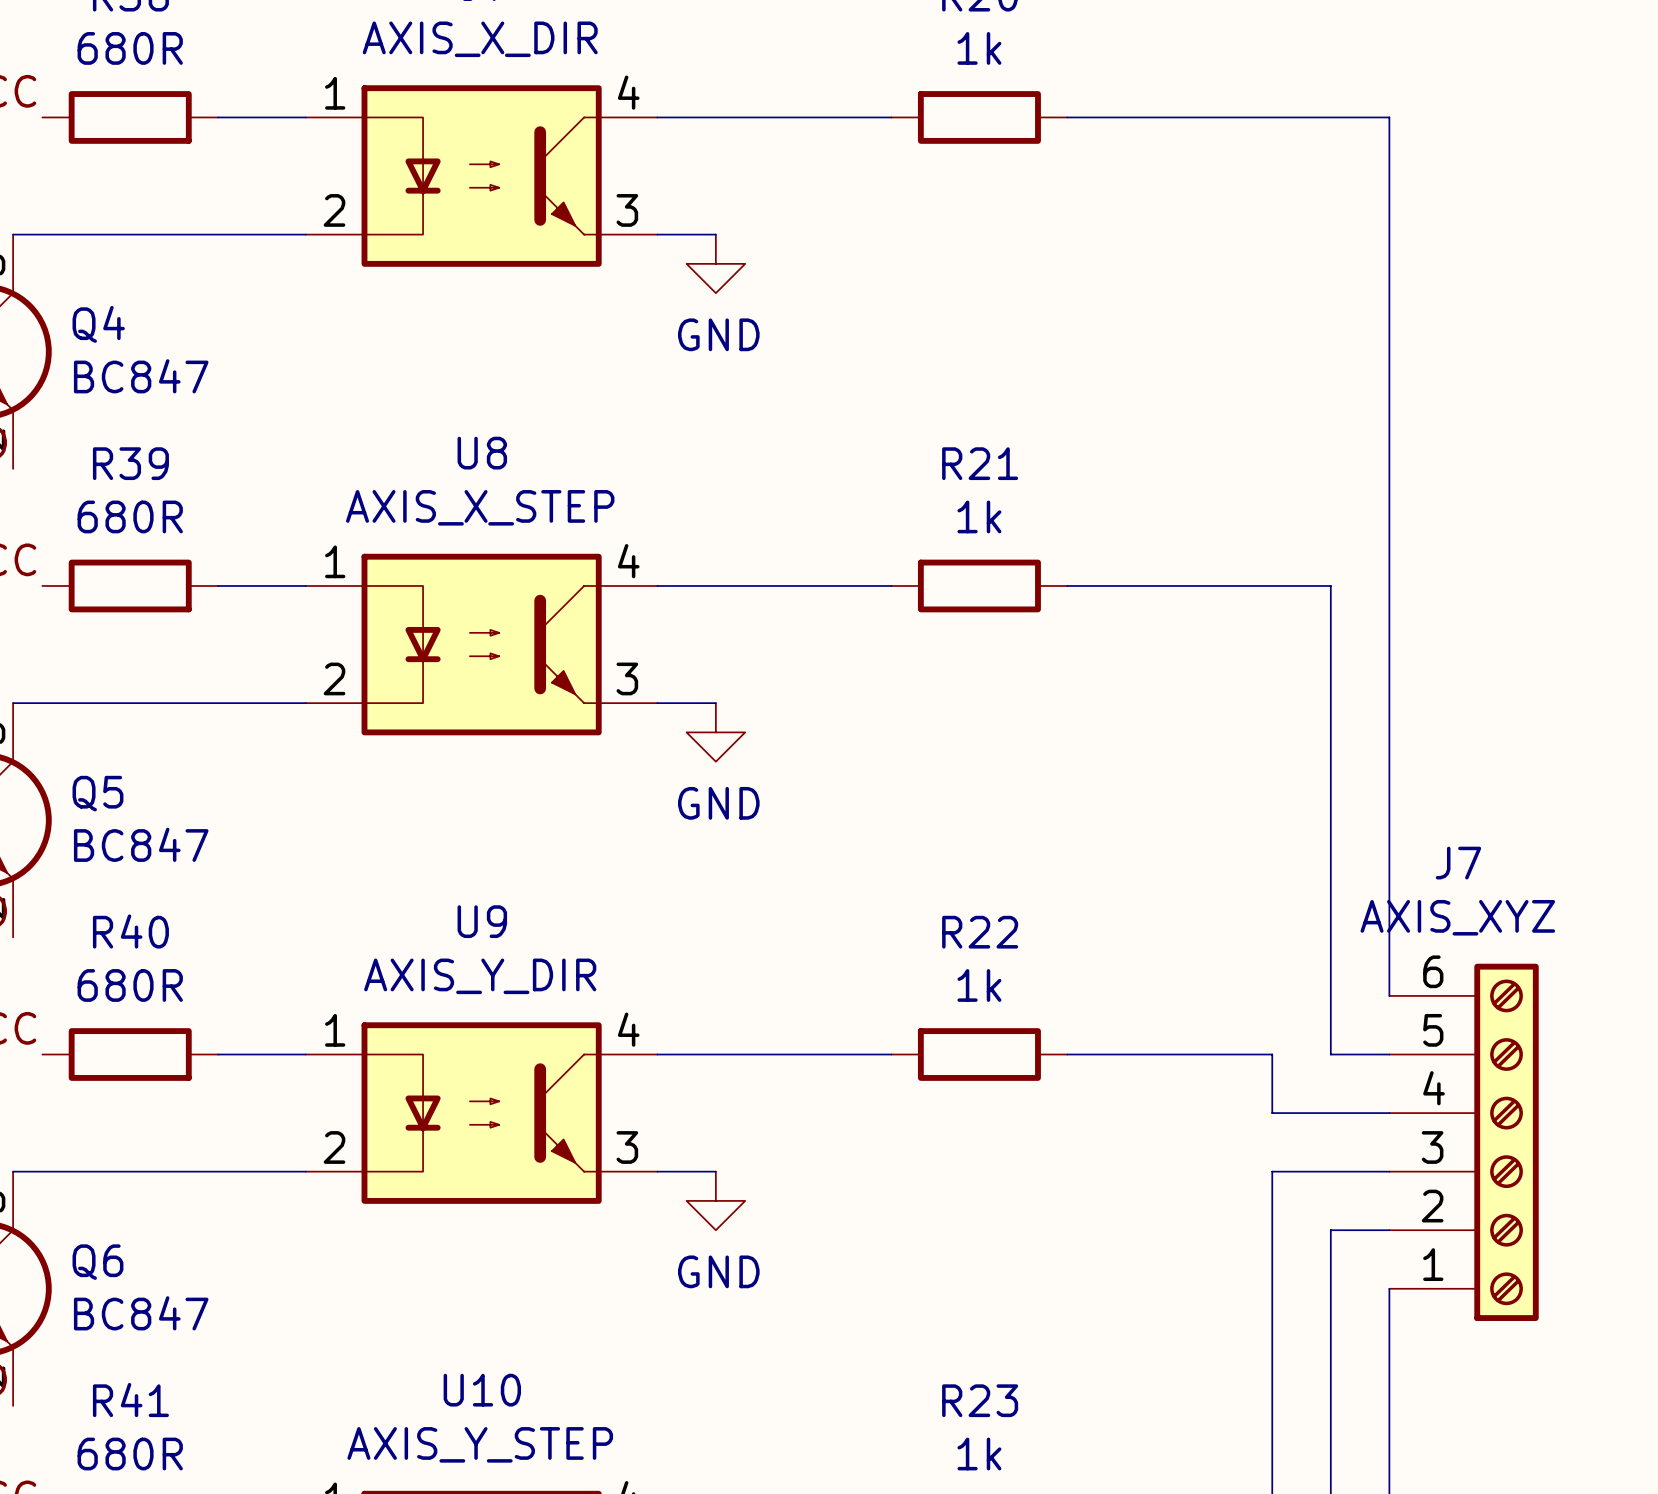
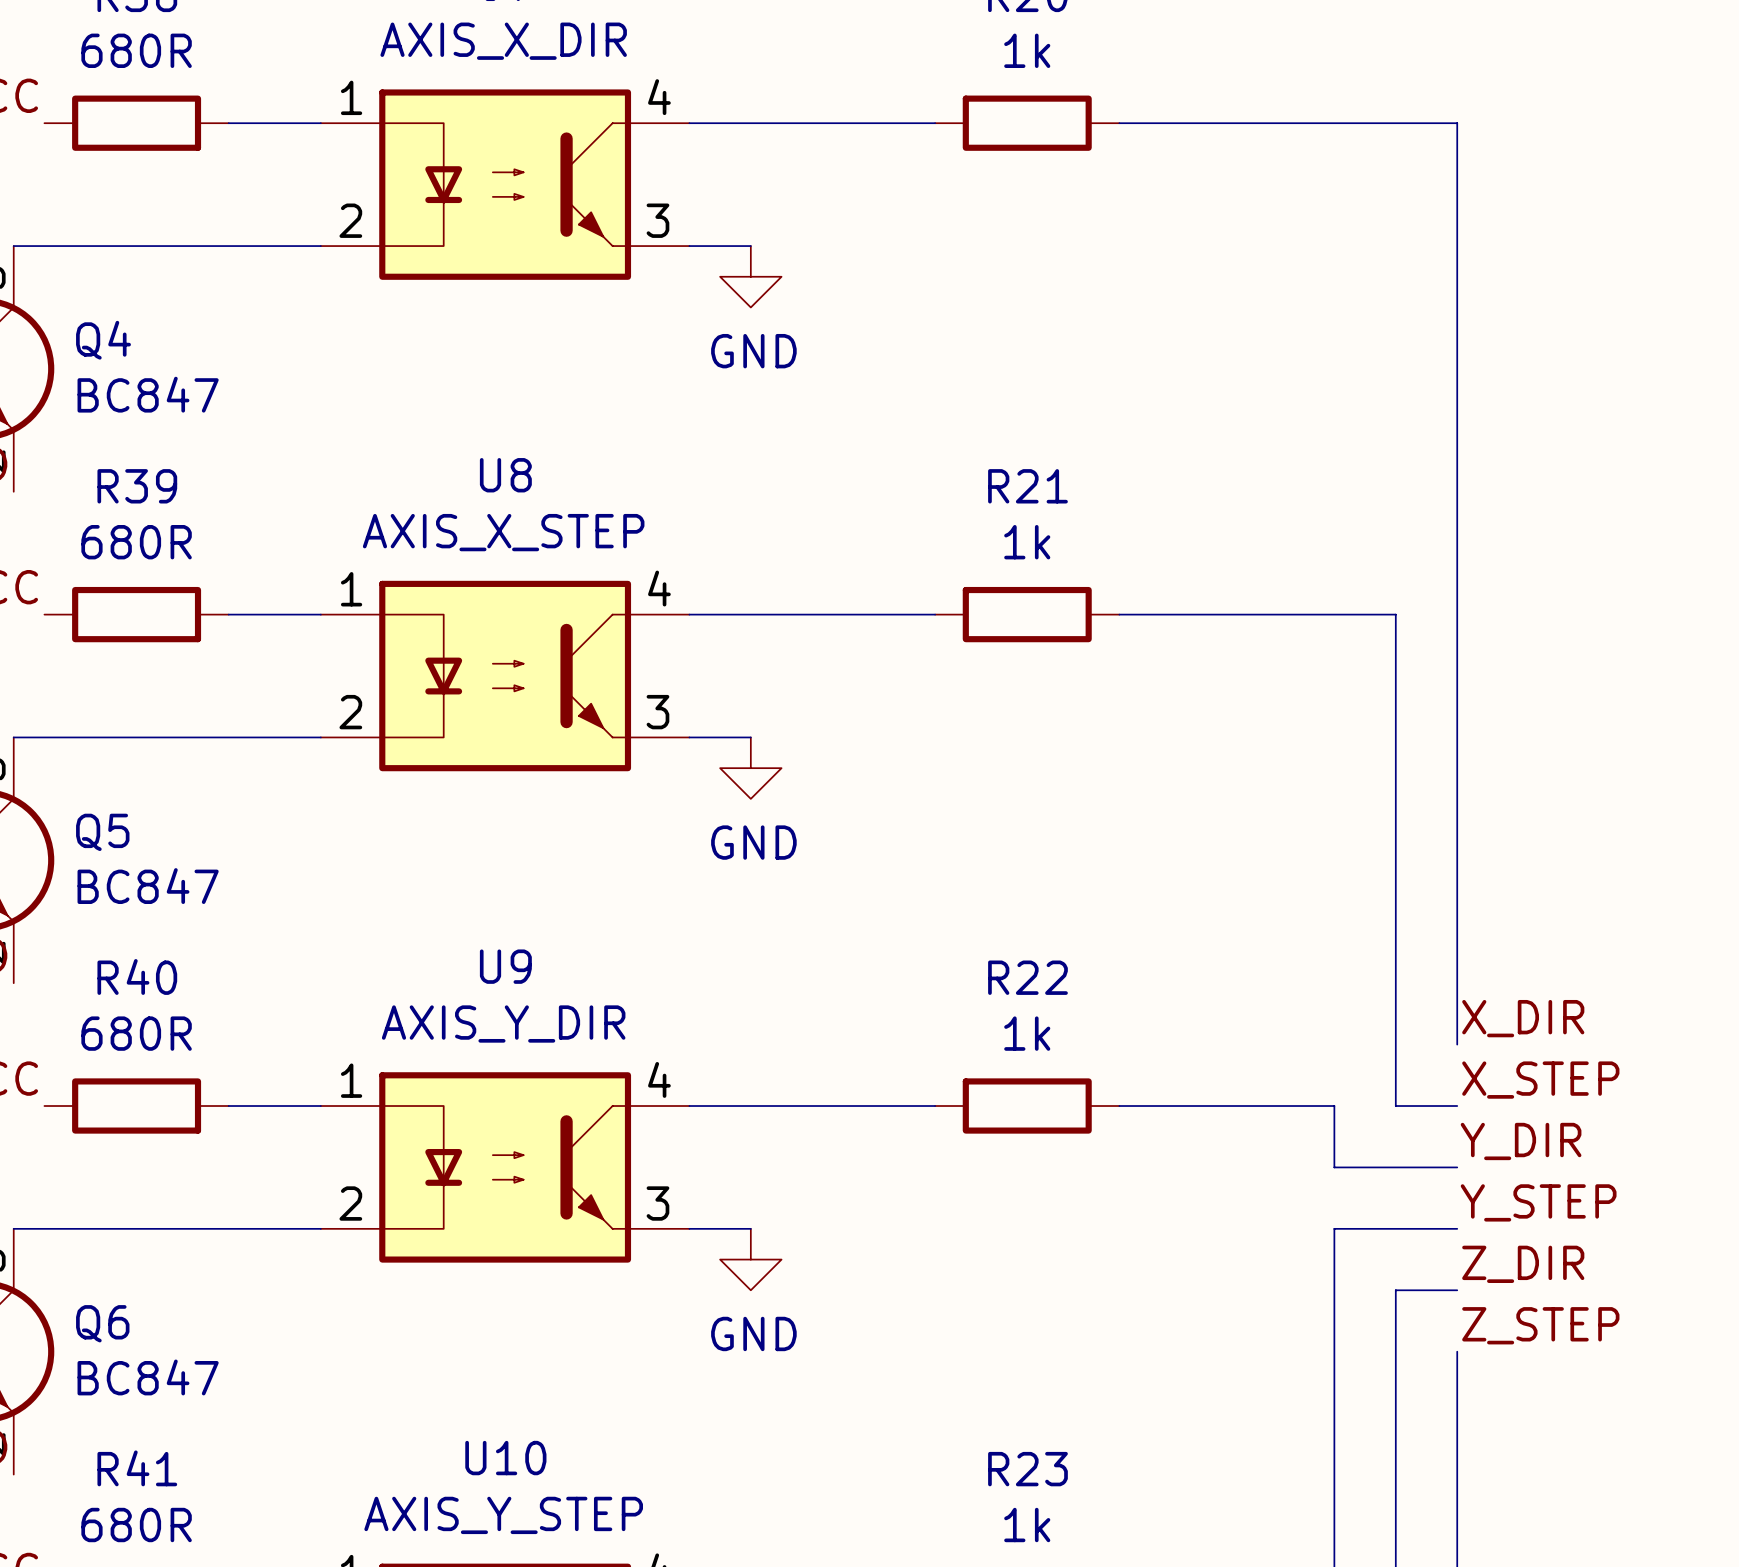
label: none -> X_DIR (1523, 1018)
label: none -> X_STEP (1540, 1080)
label: none -> Y_DIR (1521, 1141)
J7: AXIS_XYZ (1464, 1142) -> none
label: none -> Y_STEP (1538, 1202)
label: none -> Z_DIR (1523, 1264)
label: none -> Z_STEP (1540, 1325)

